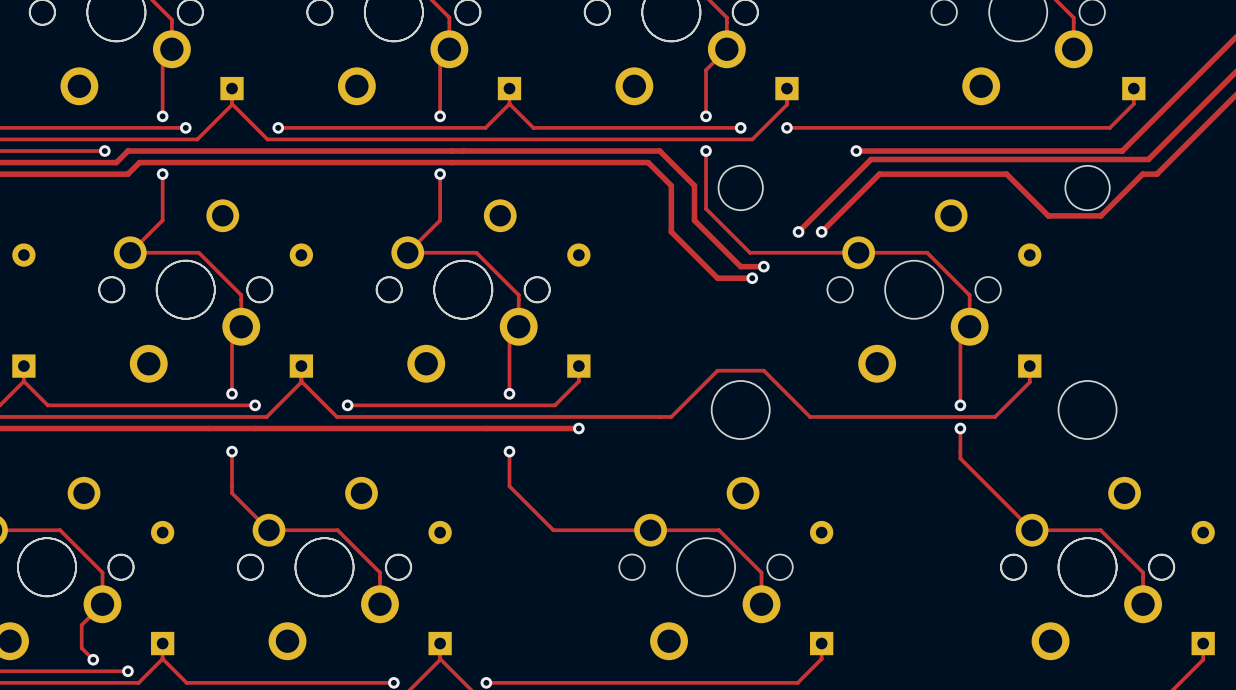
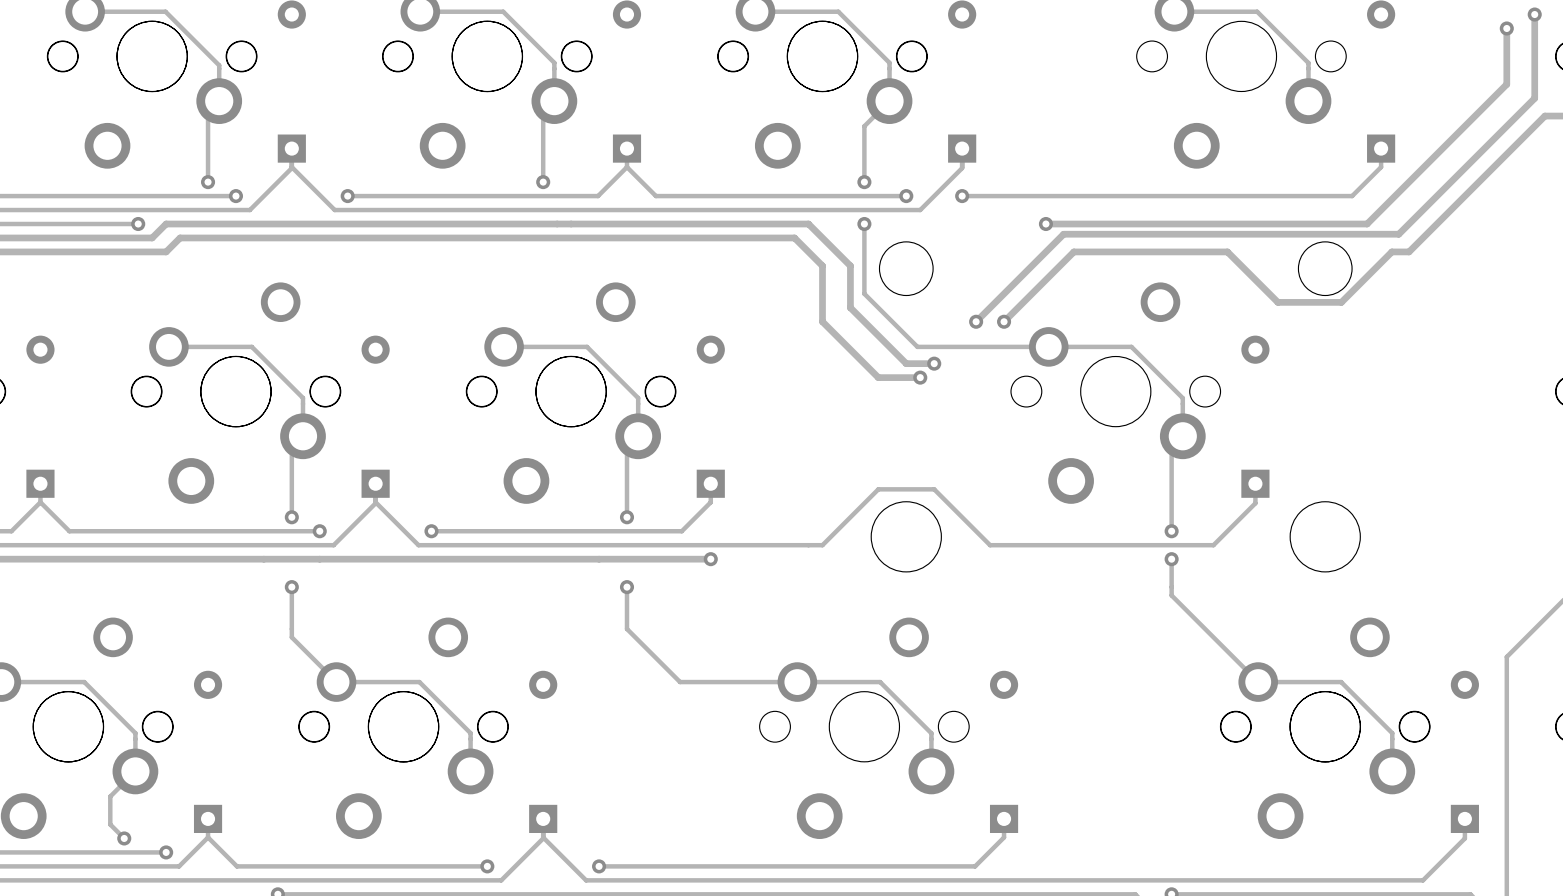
track: (162, 174) (162, 220) (130, 252) -> none
via: (162, 174) -> none
track: (440, 174) (440, 220) (407, 252) -> none
via: (440, 174) -> none

